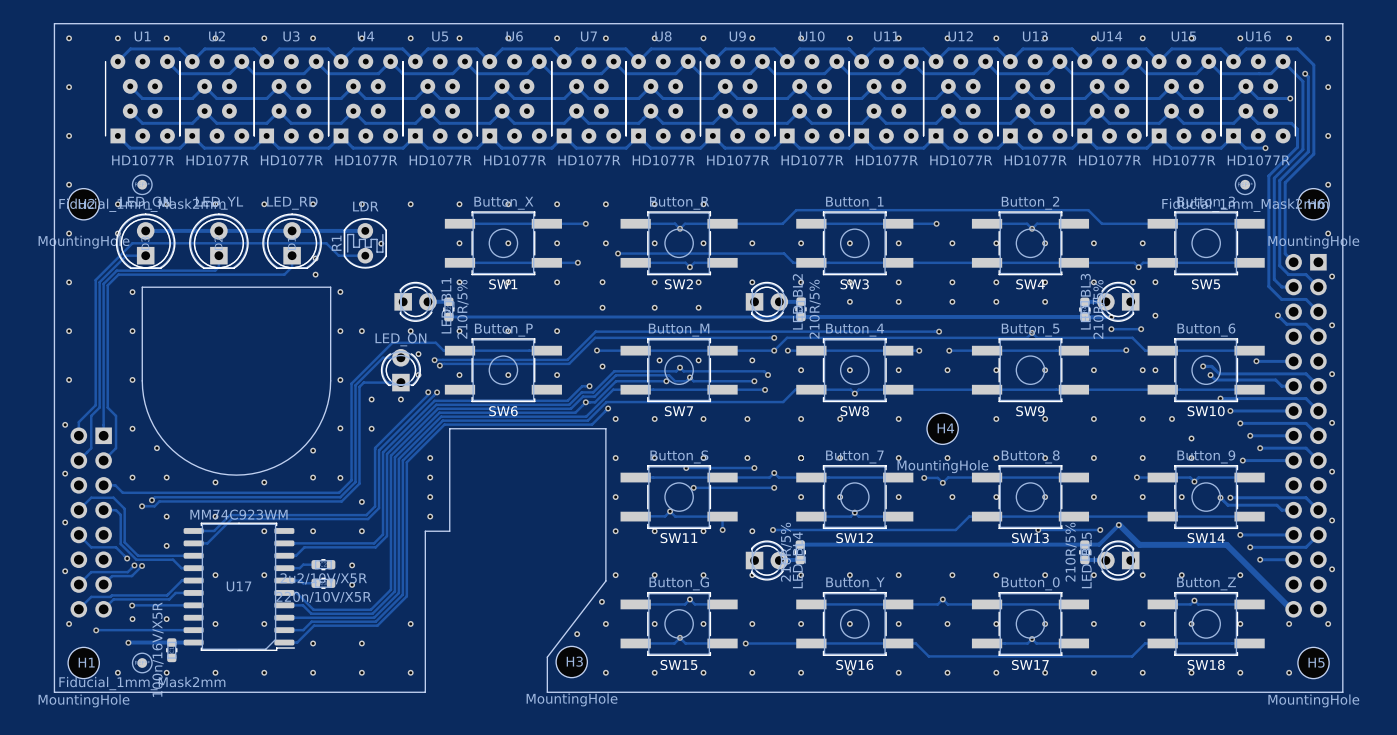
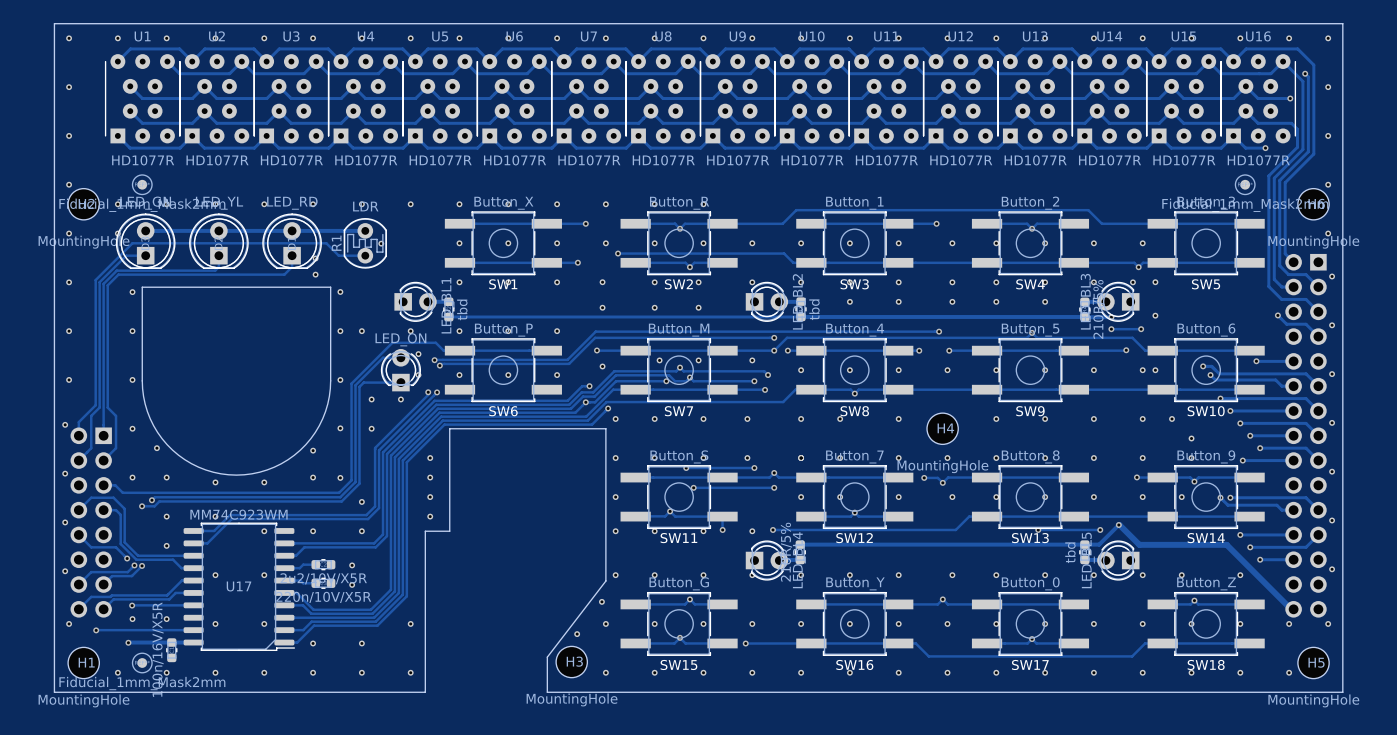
part value: 210R/5% (462, 309) -> tbd (462, 309)
part value: 210R/5% (815, 309) -> tbd (814, 309)
part value: 210R/5% (1071, 552) -> tbd (1070, 552)

